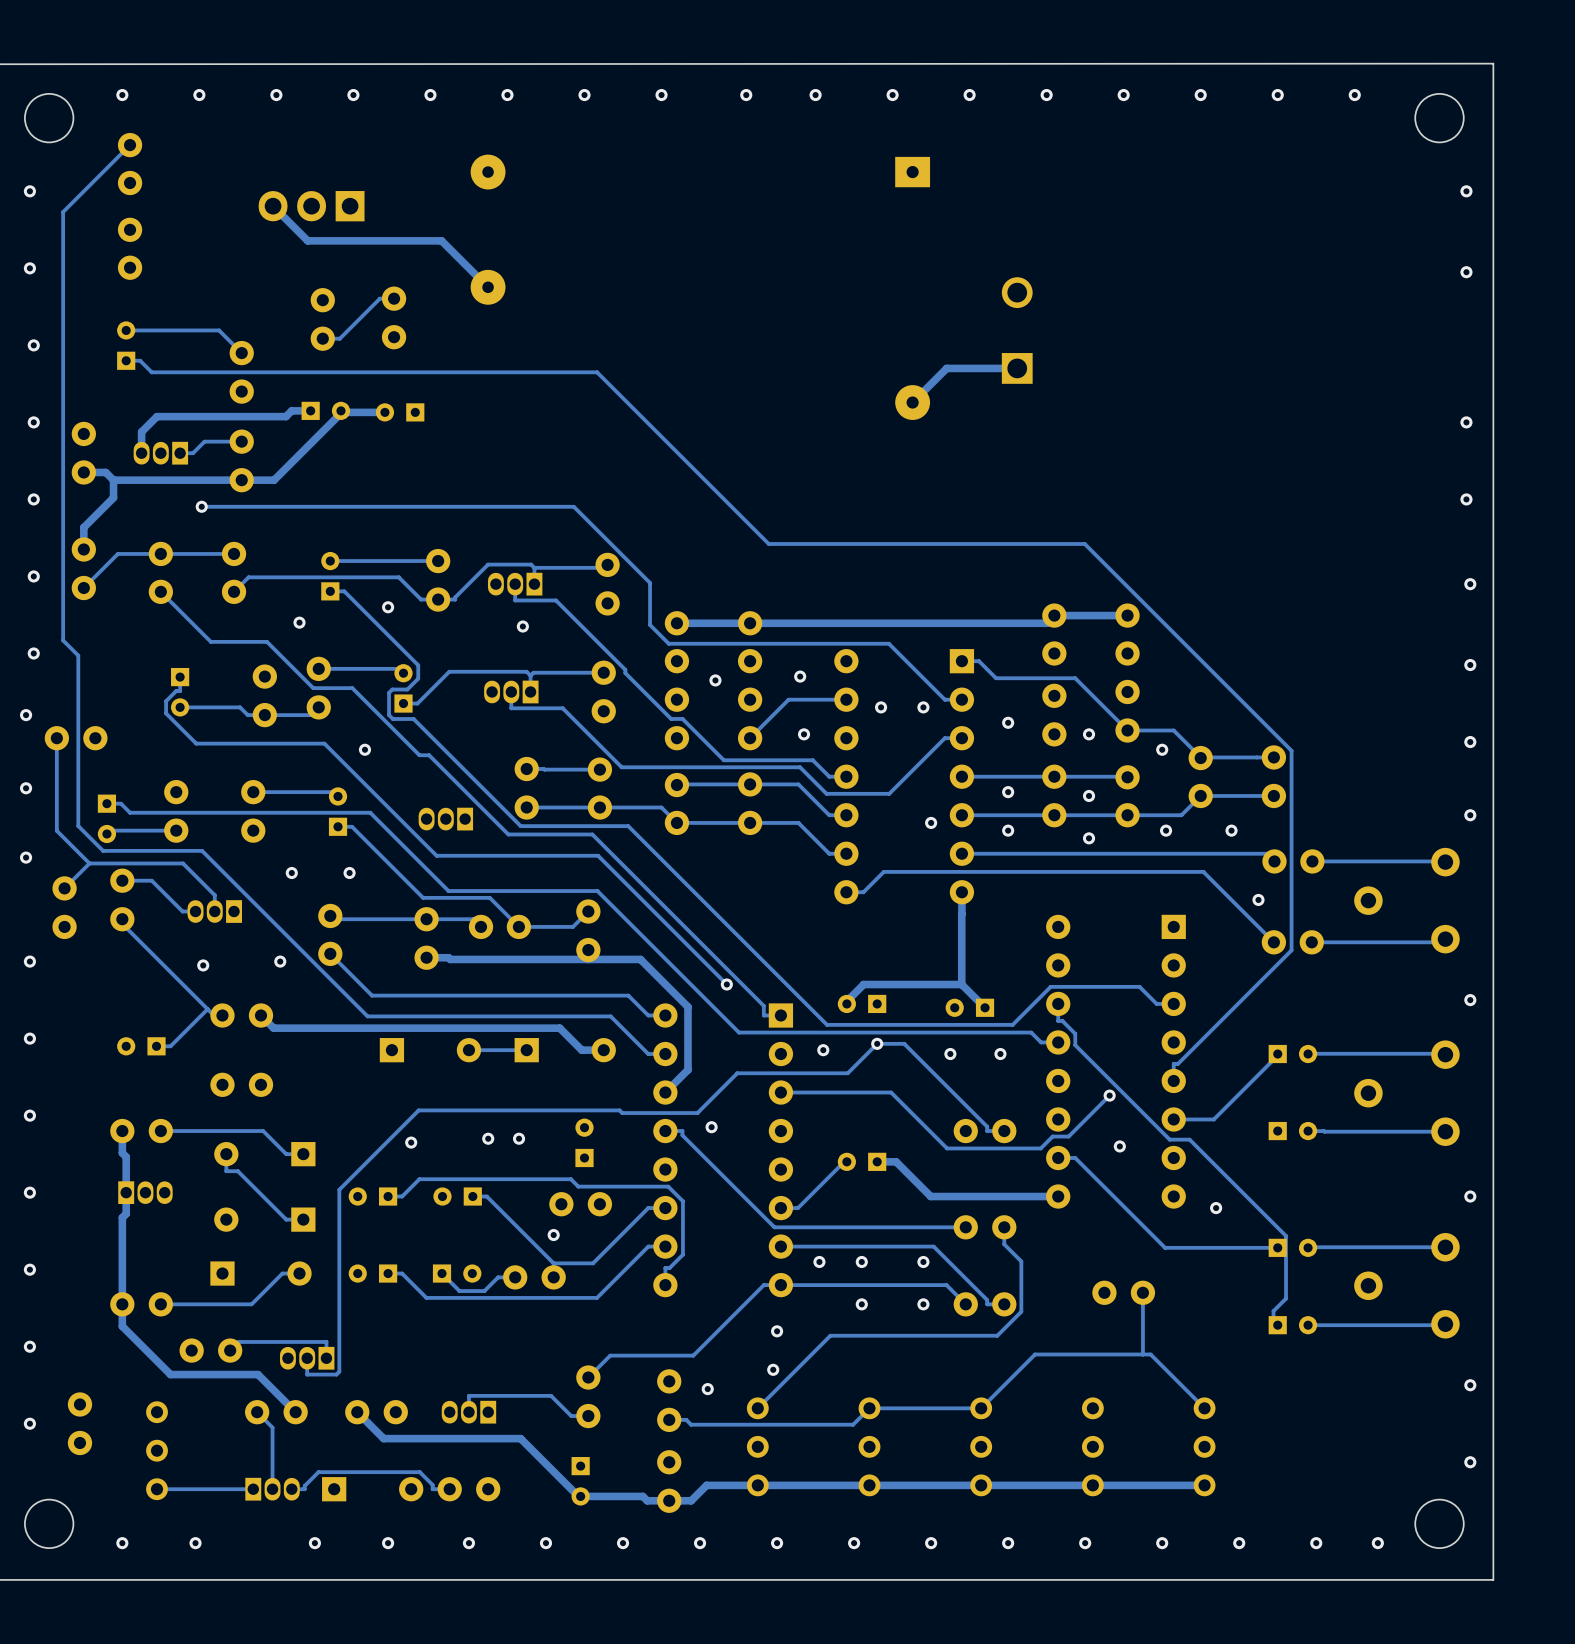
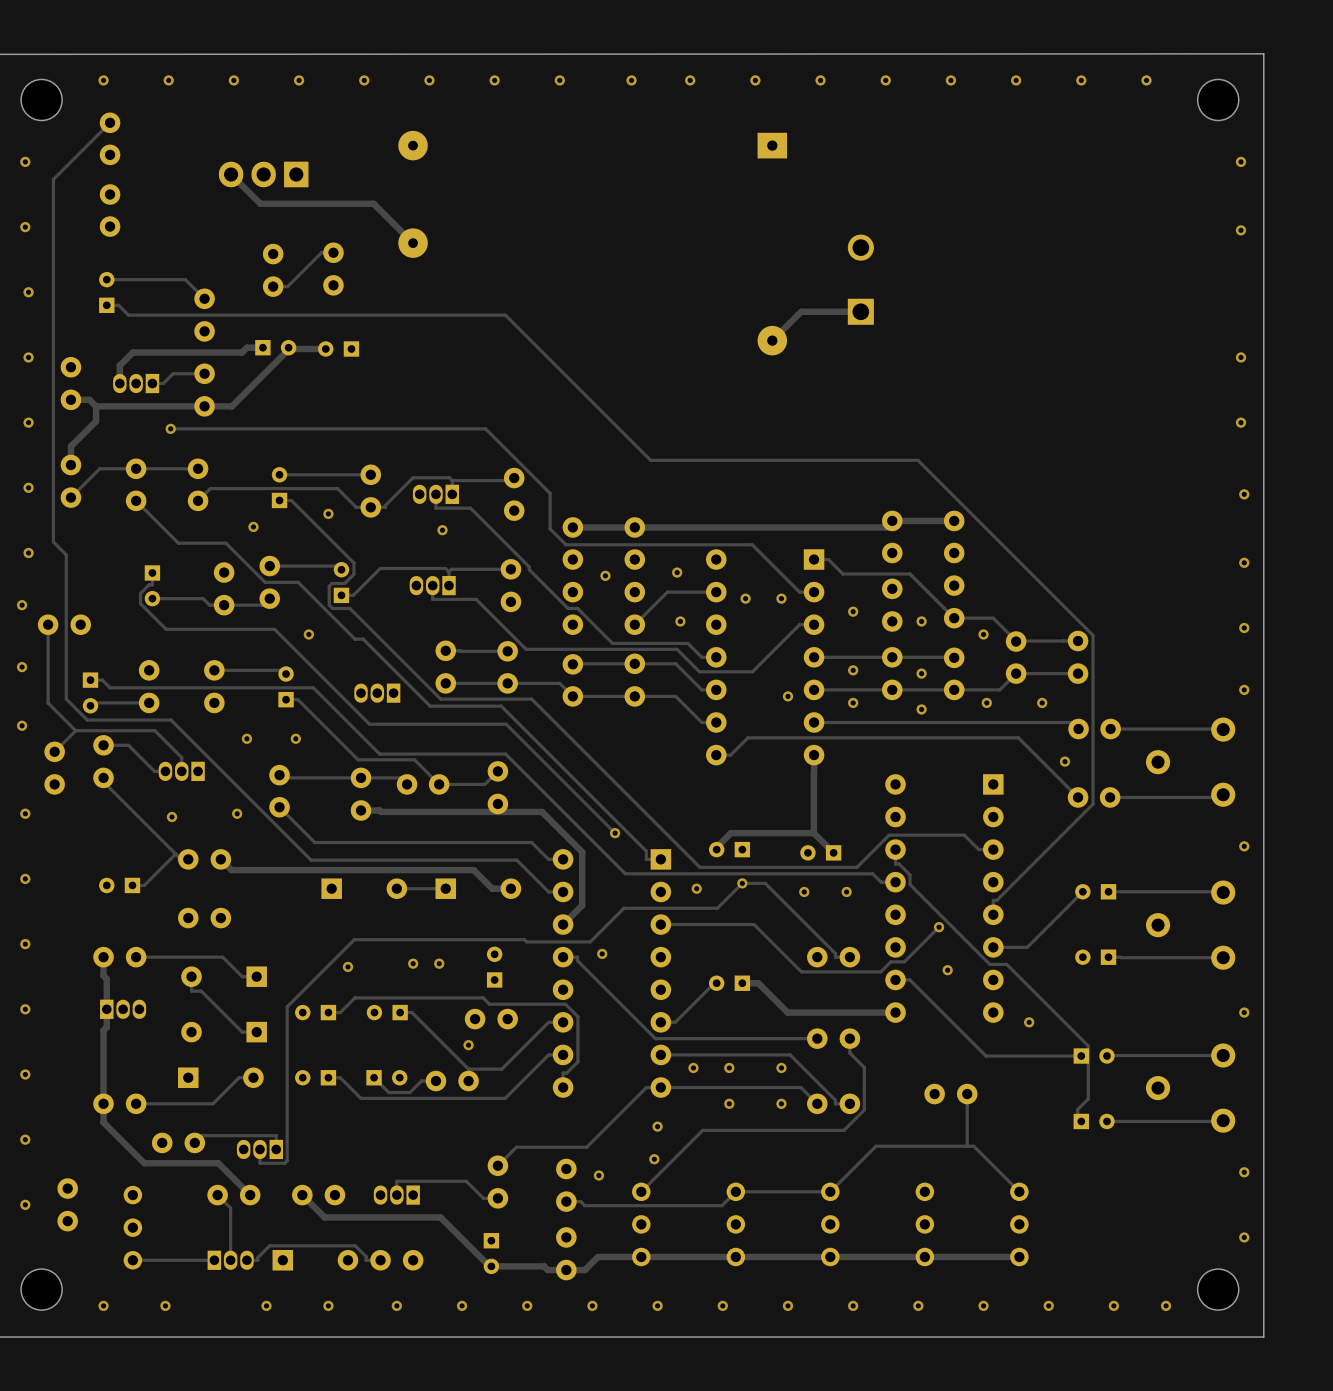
part rotation: 0° (1292, 1054) -> 180° (1095, 891)
part rotation: 0° (1292, 1131) -> 180° (1095, 957)

